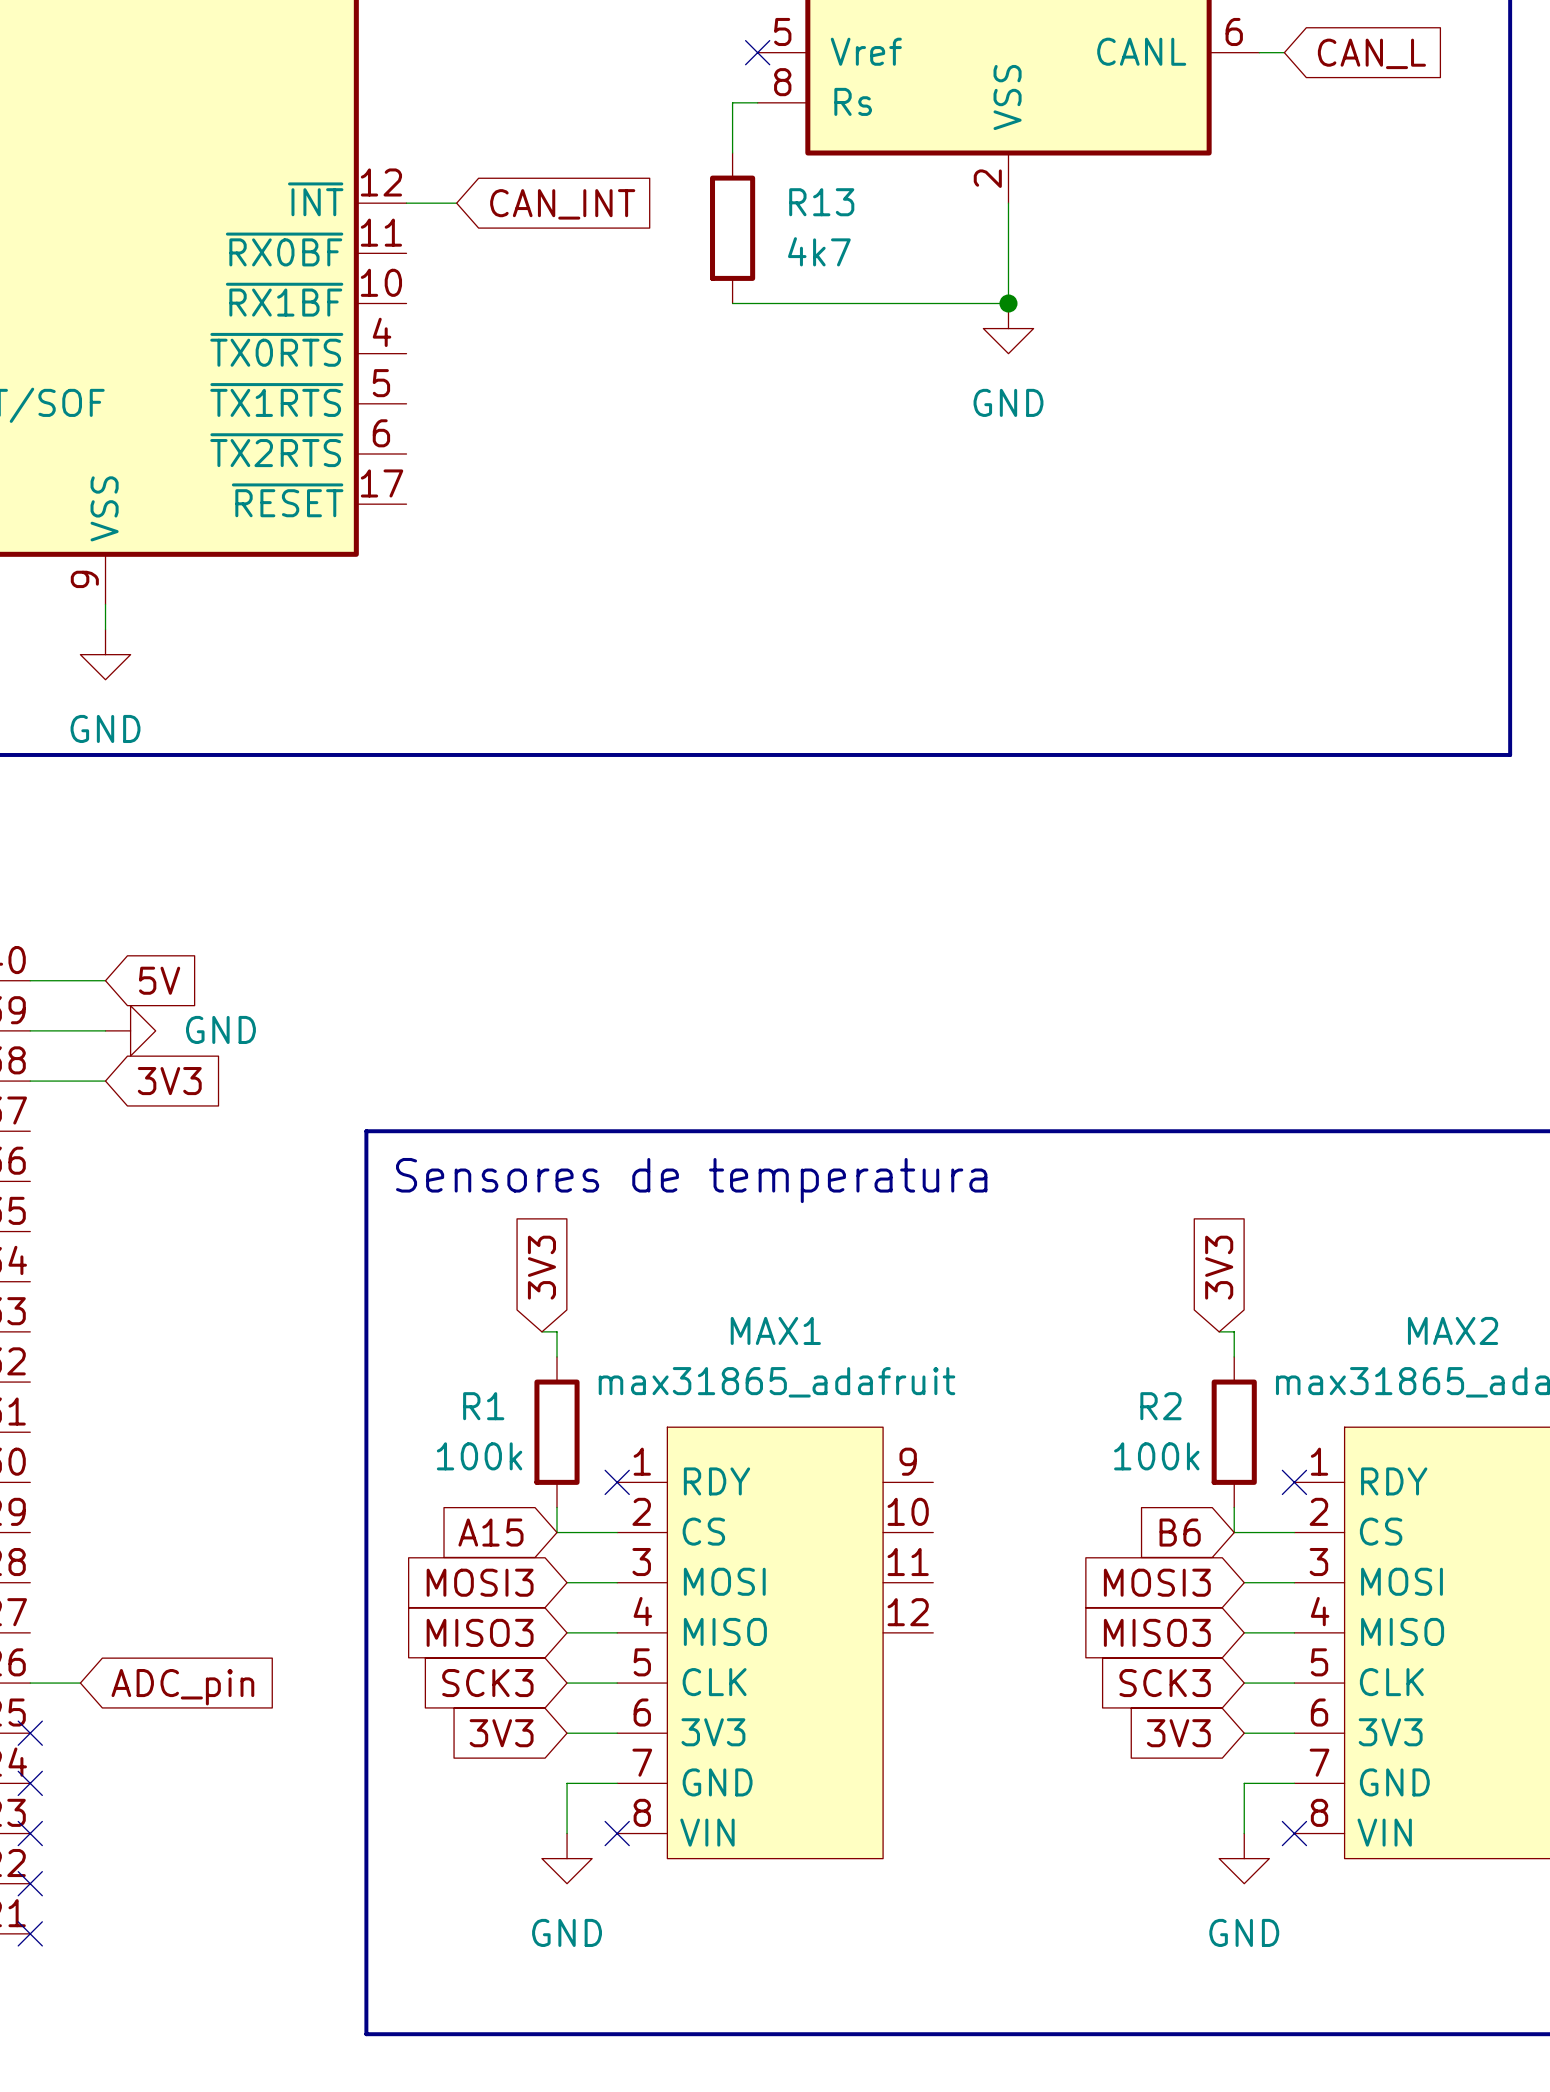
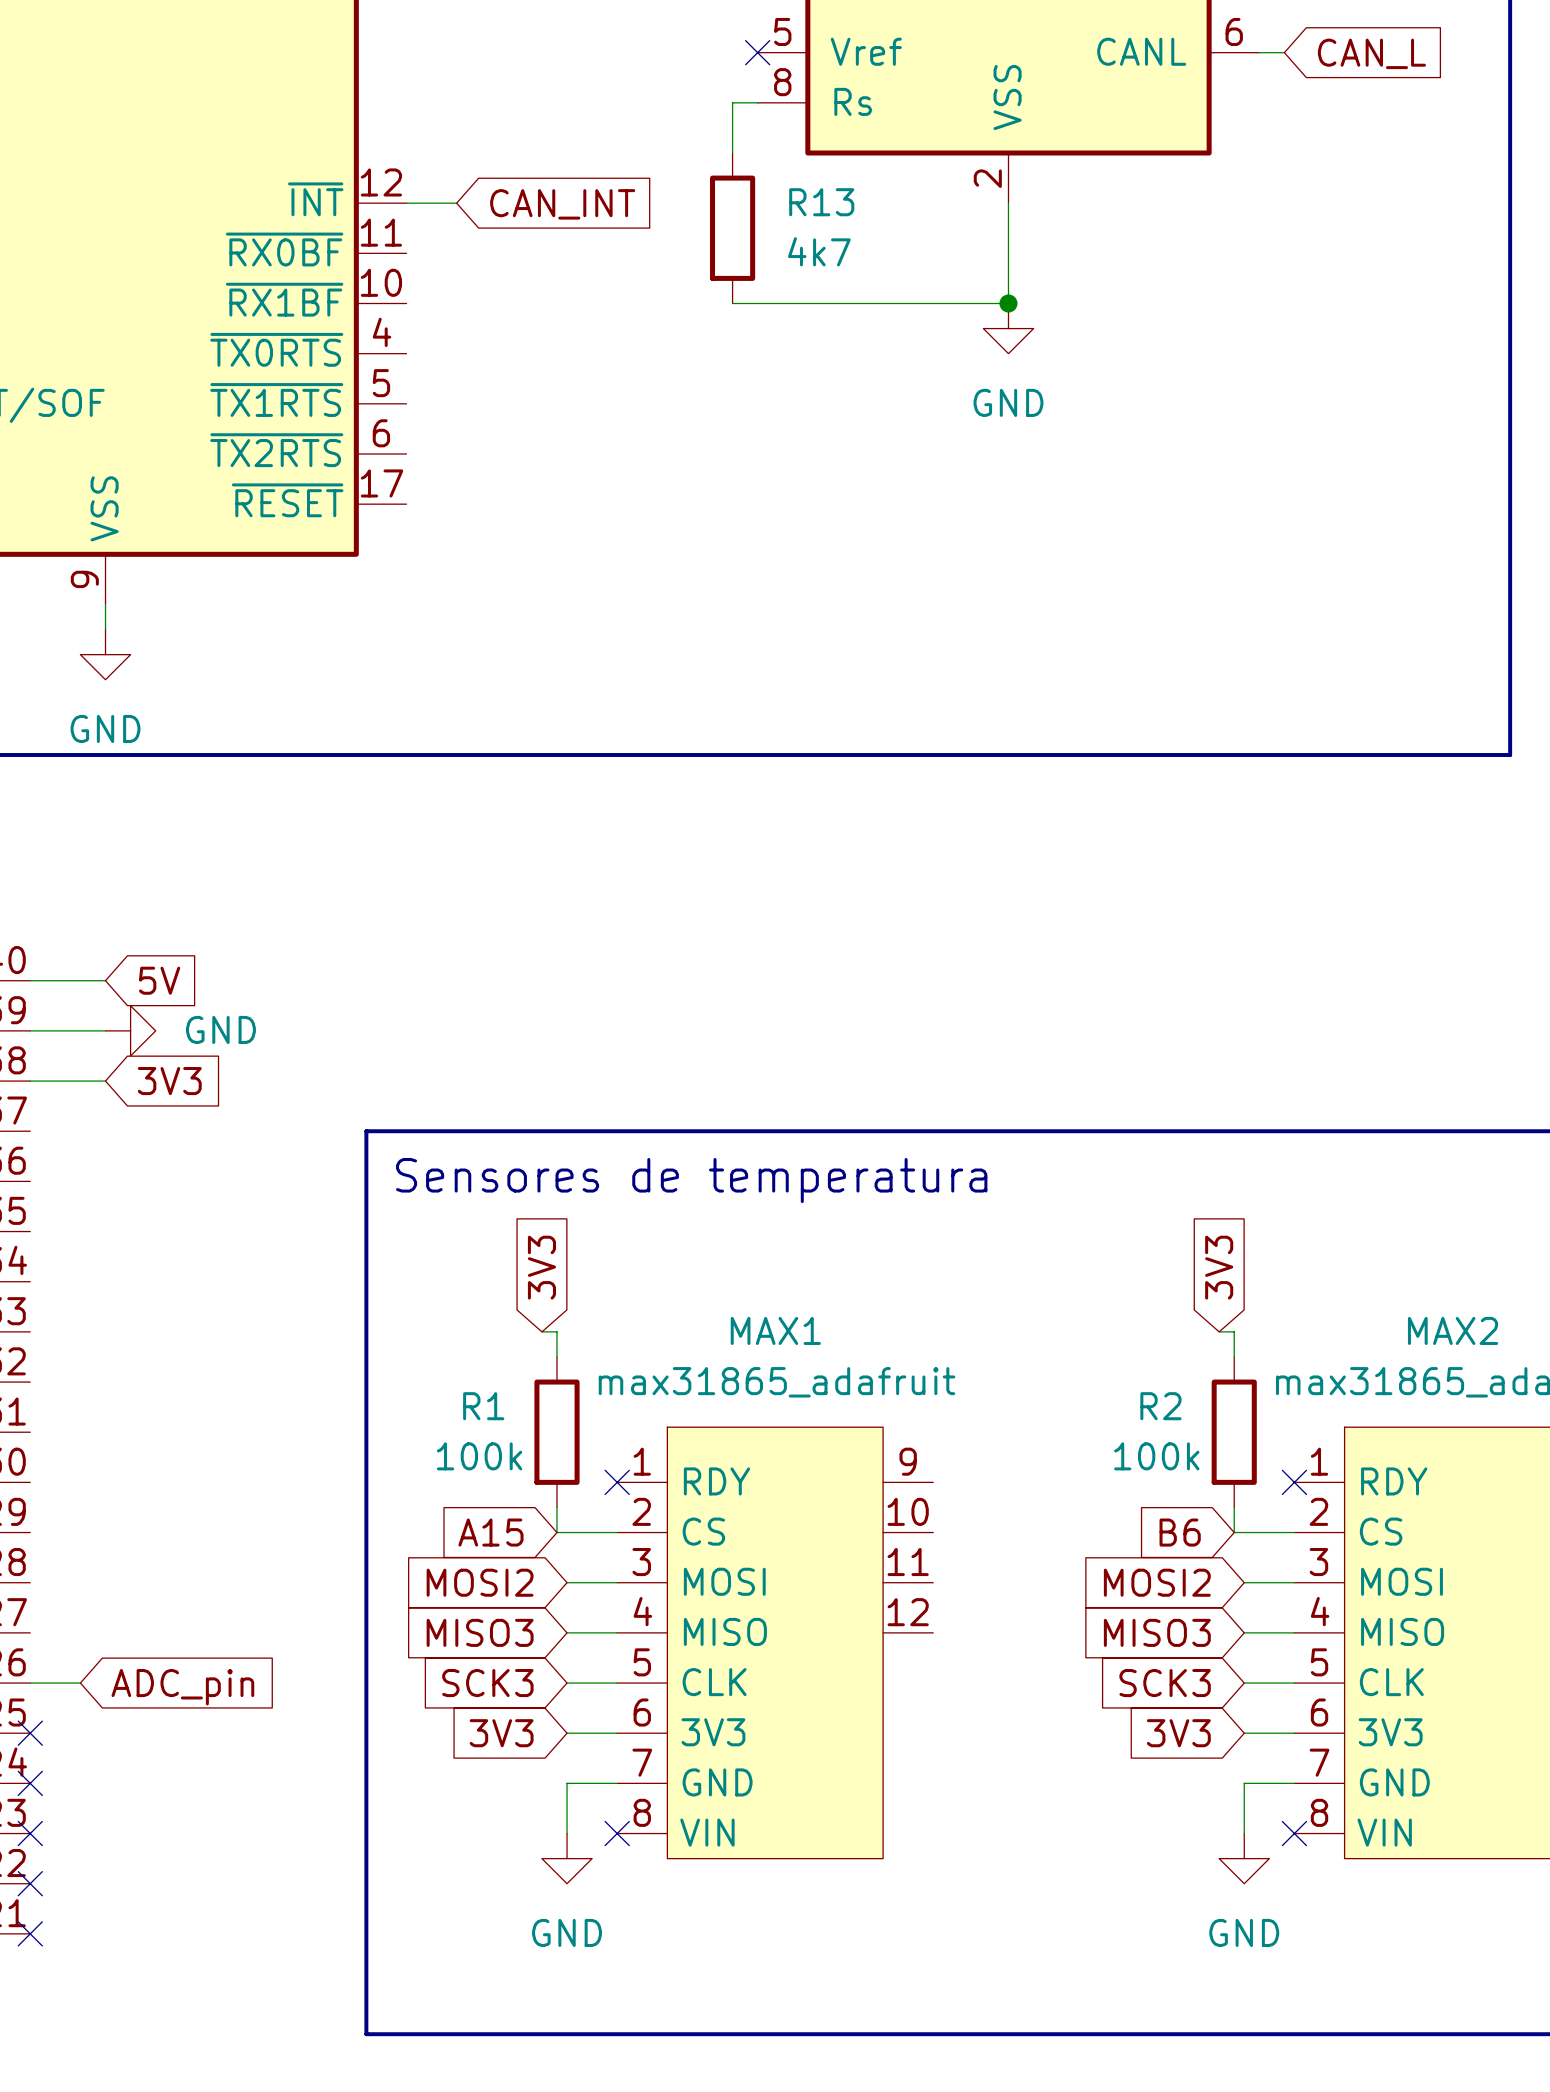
global label: MOSI3 (480, 1582) -> MOSI2 (480, 1582)
global label: MOSI3 (1157, 1582) -> MOSI2 (1157, 1582)

